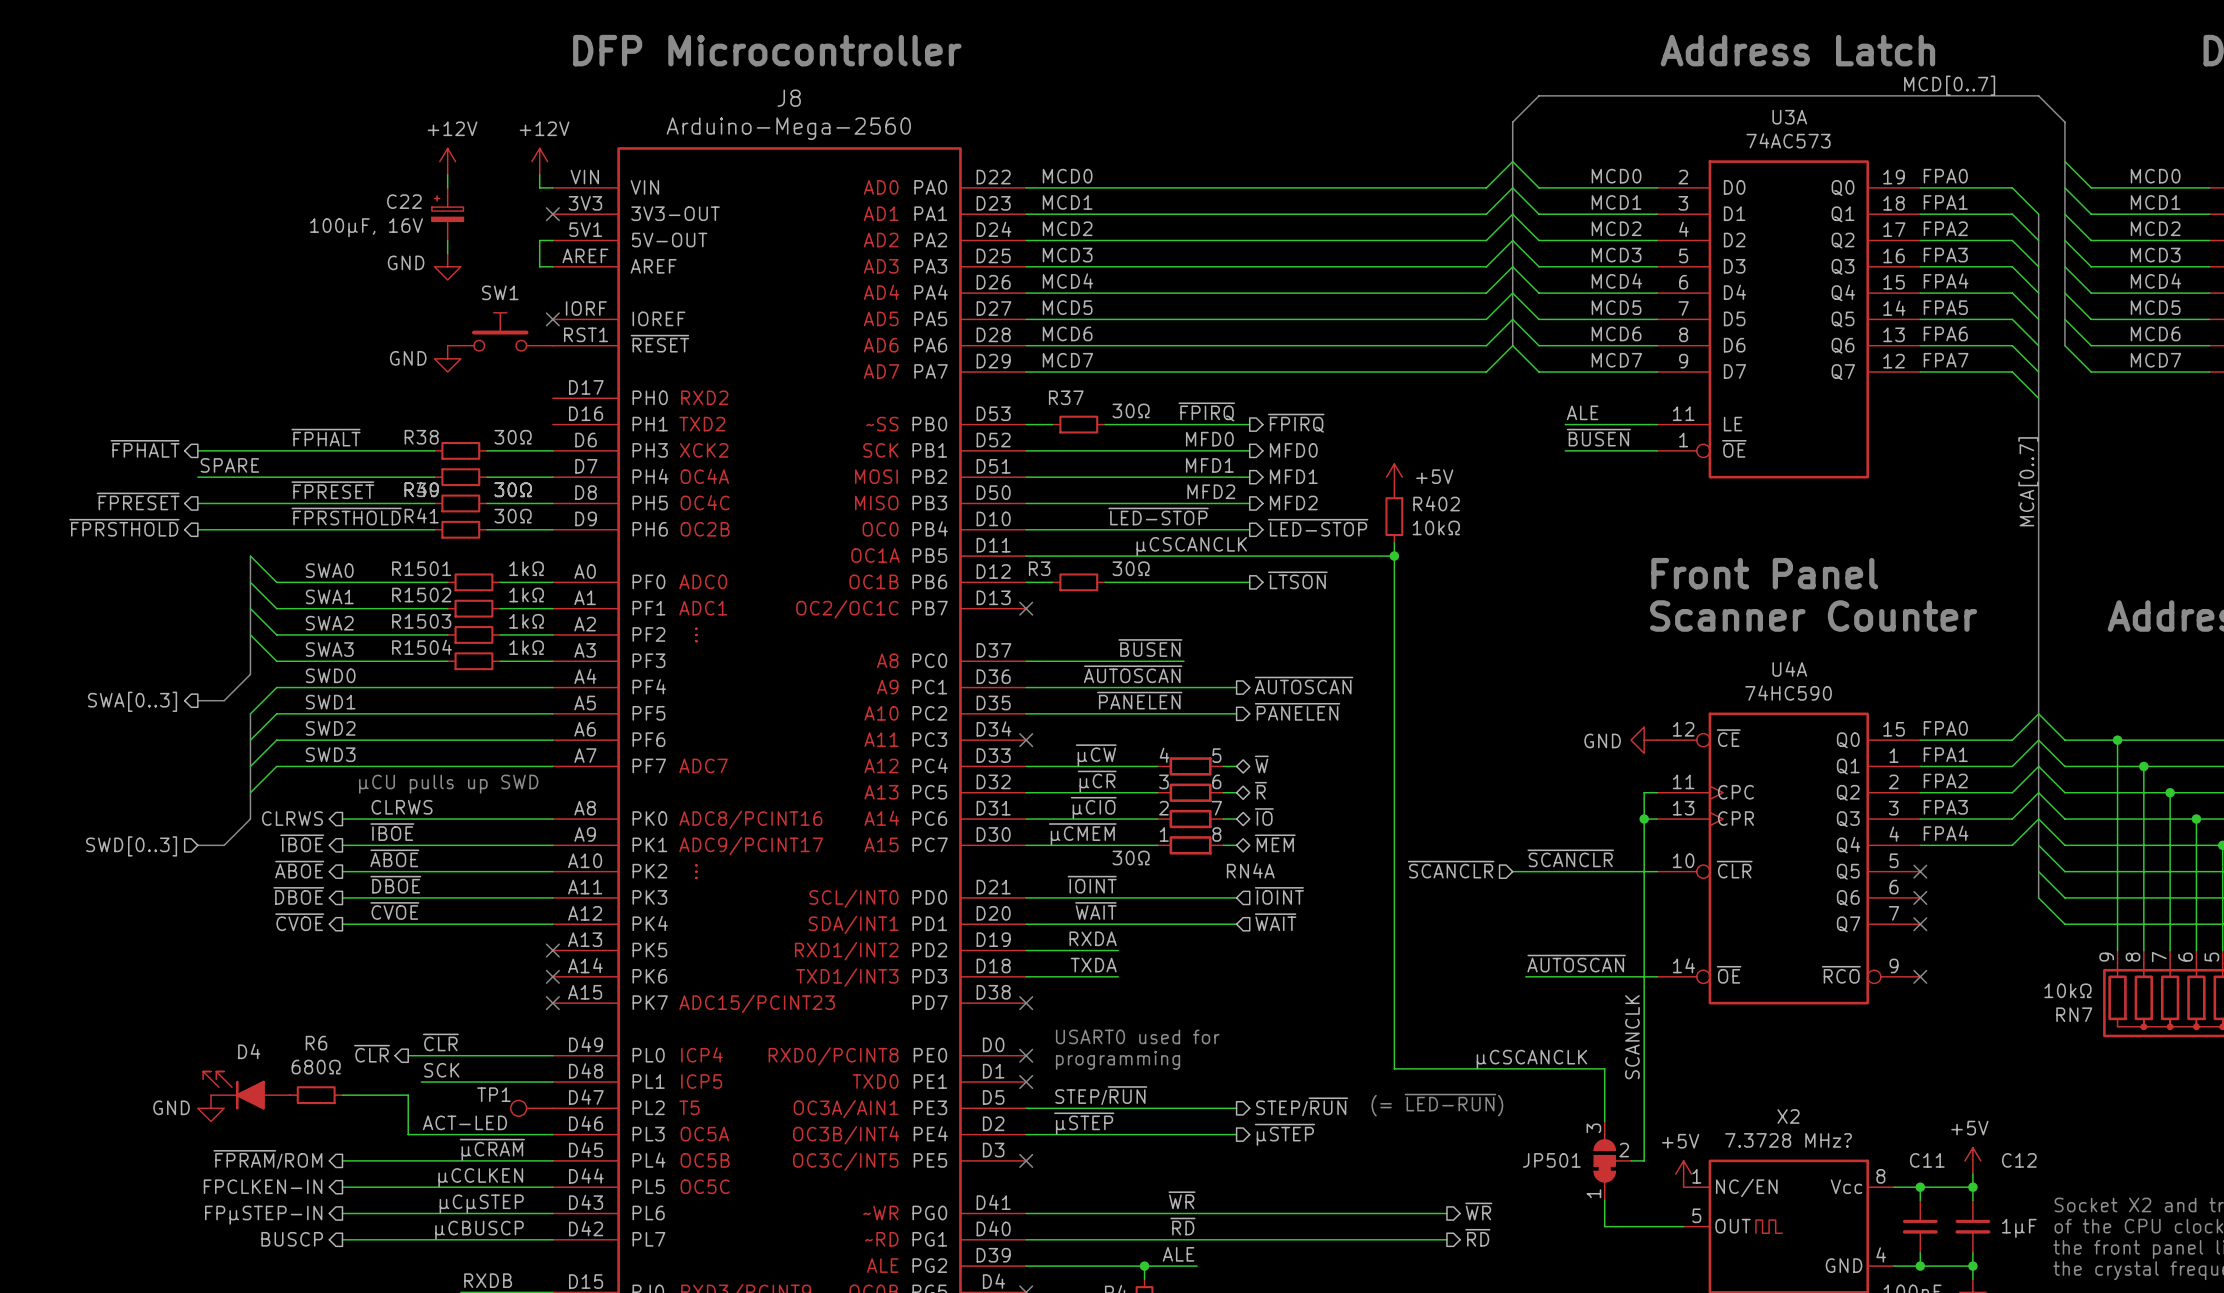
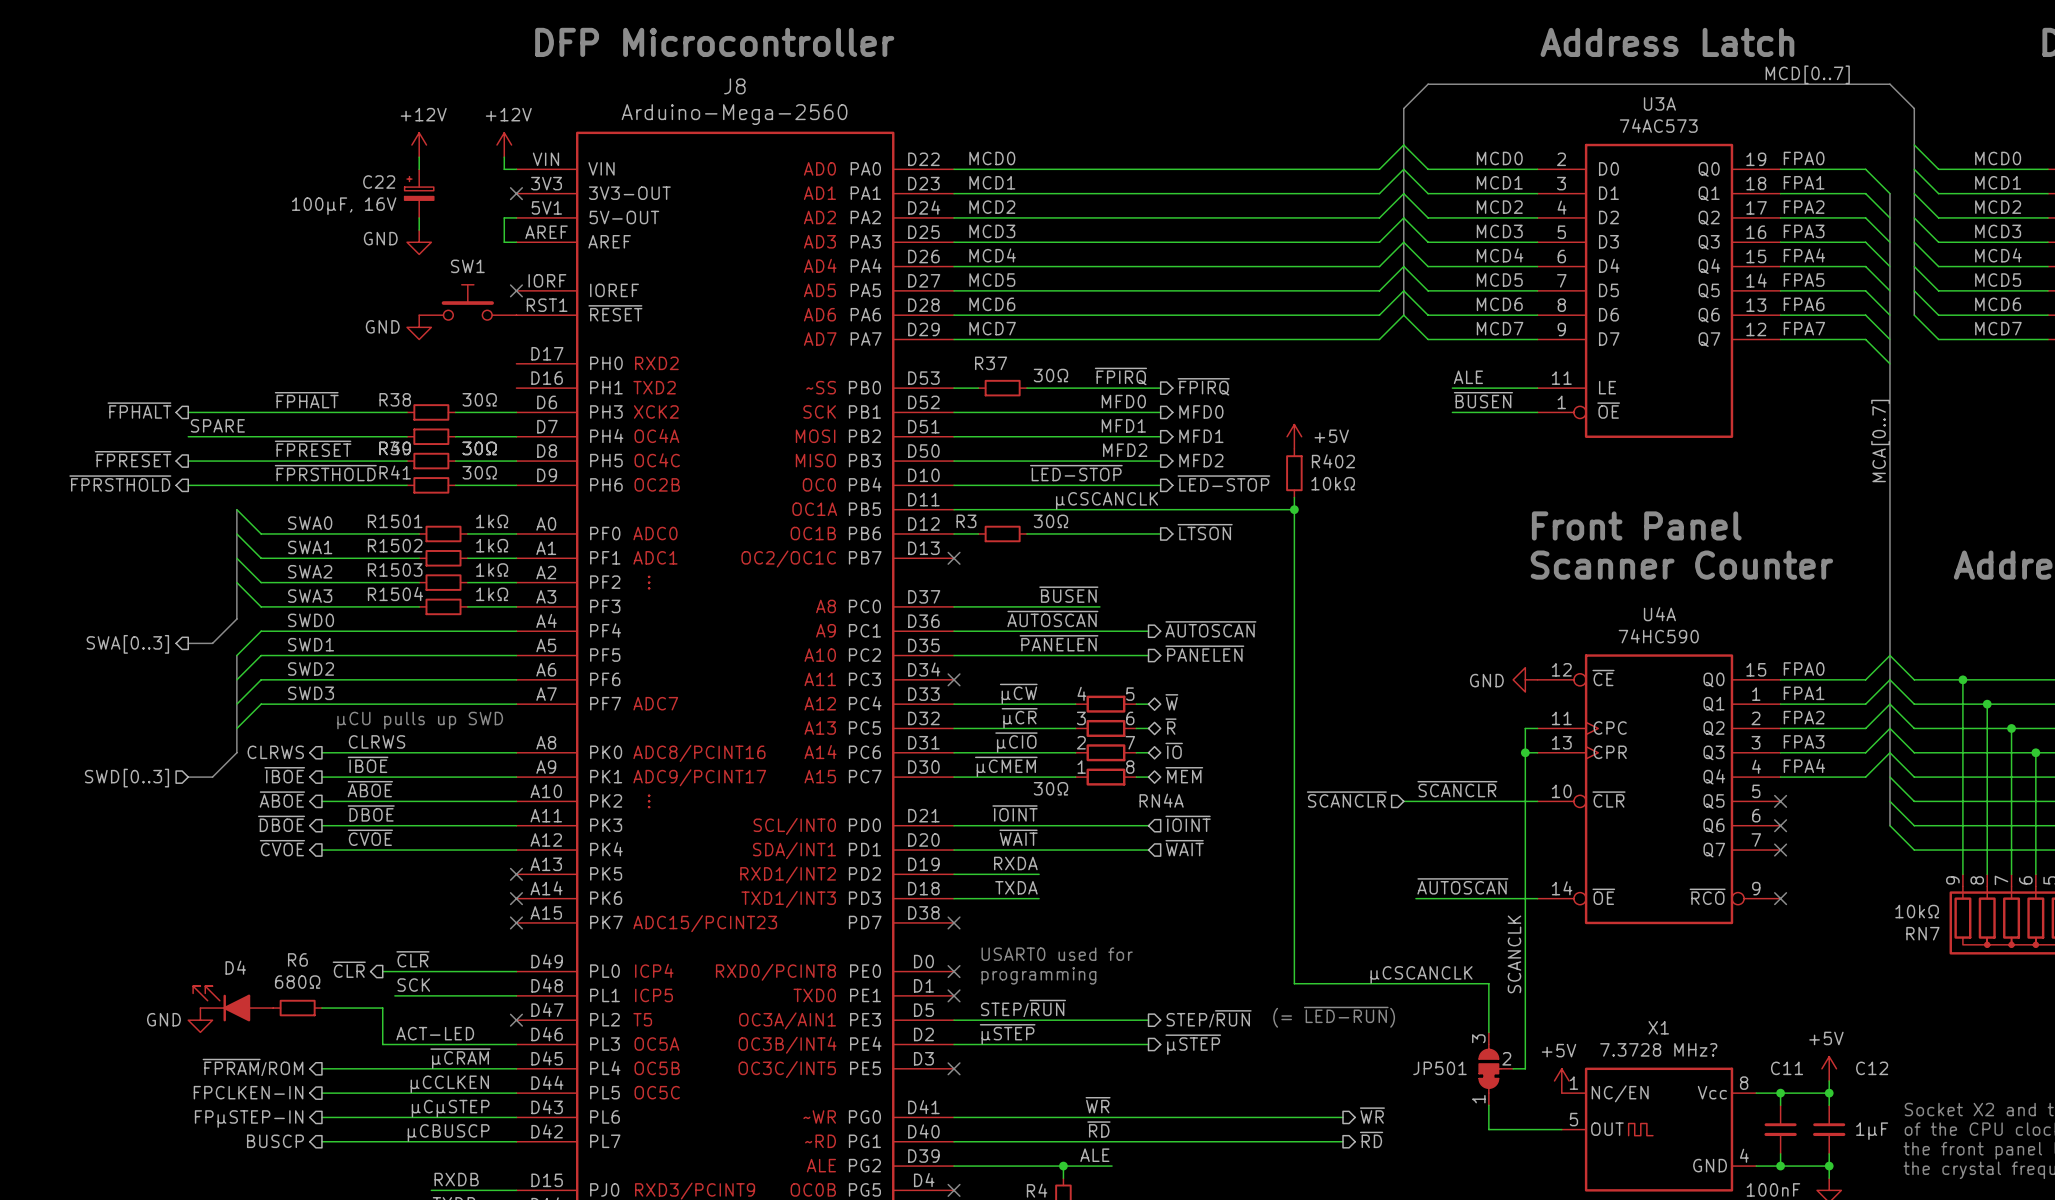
TP1: (531, 1108) -> none
no-connect mark: none -> (516, 1020)
X2 name: X2 (1788, 1116) -> X1 (1658, 1027)

